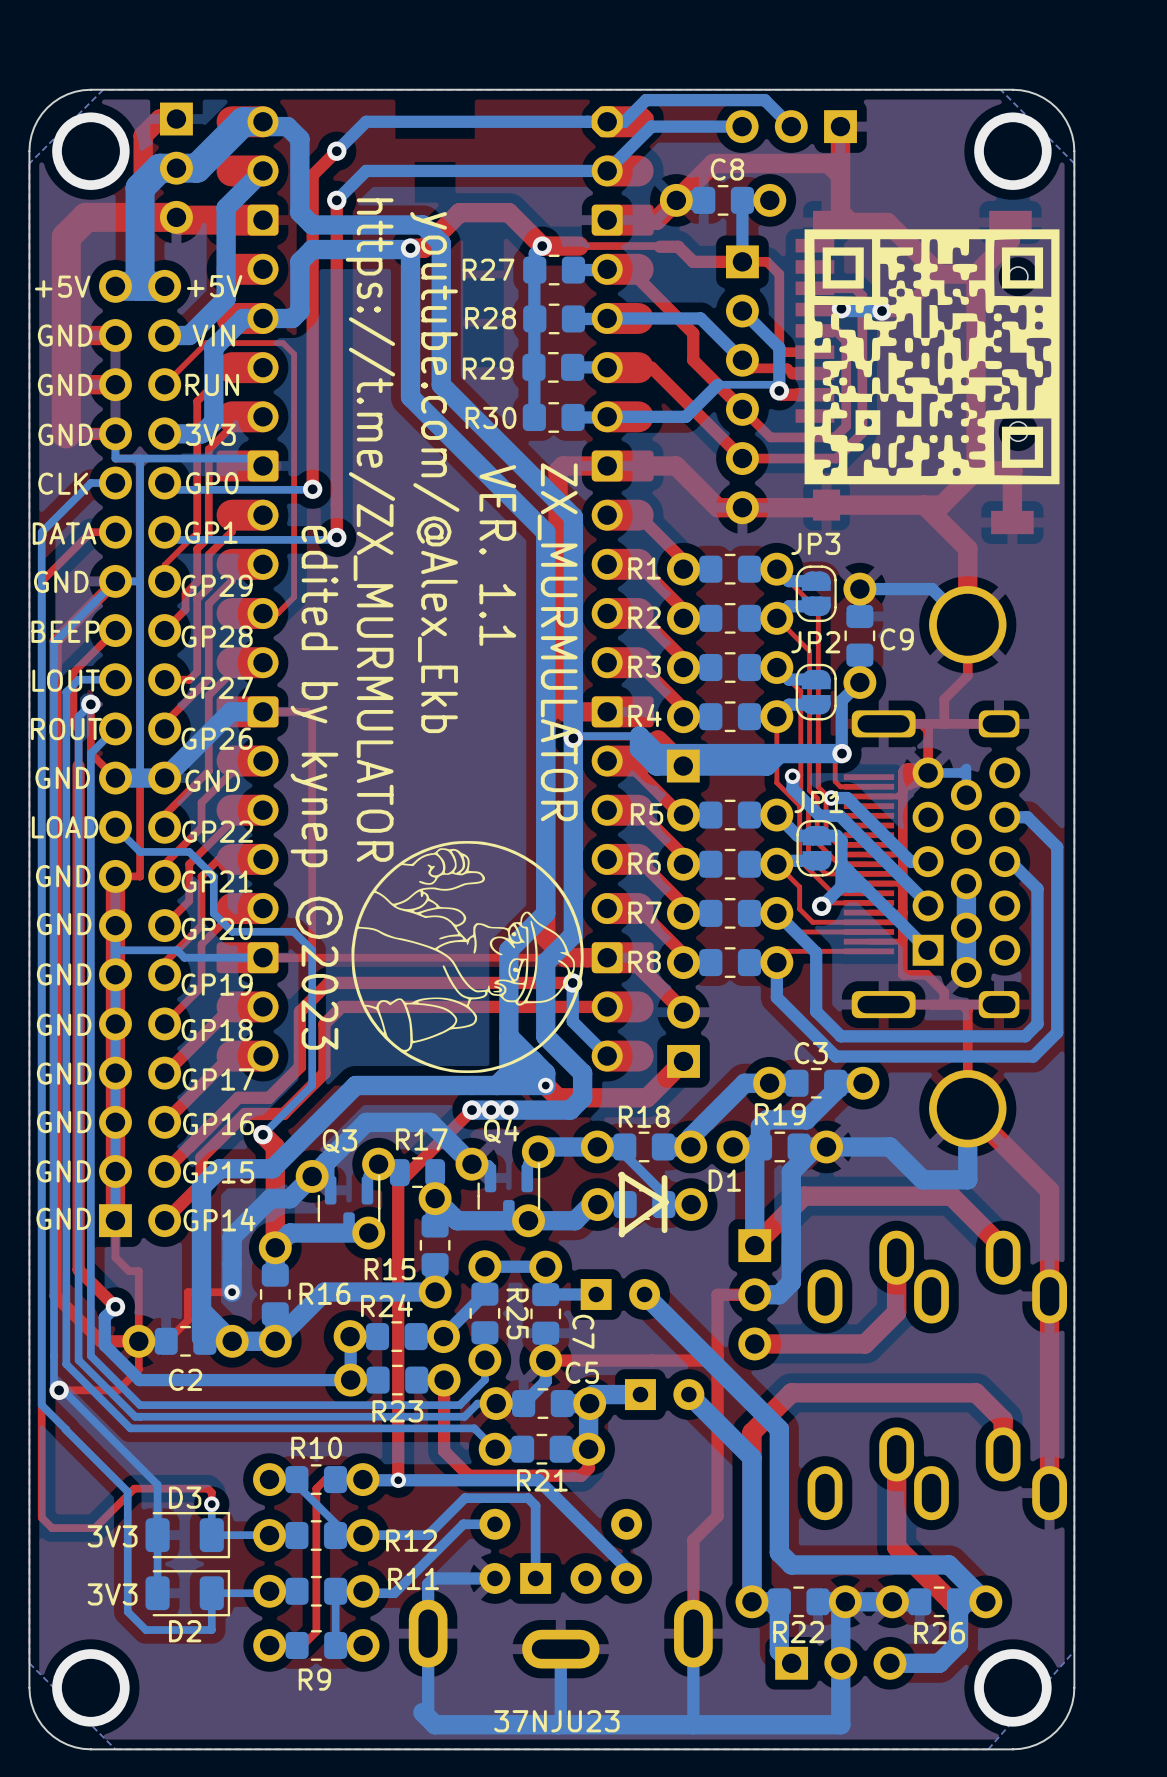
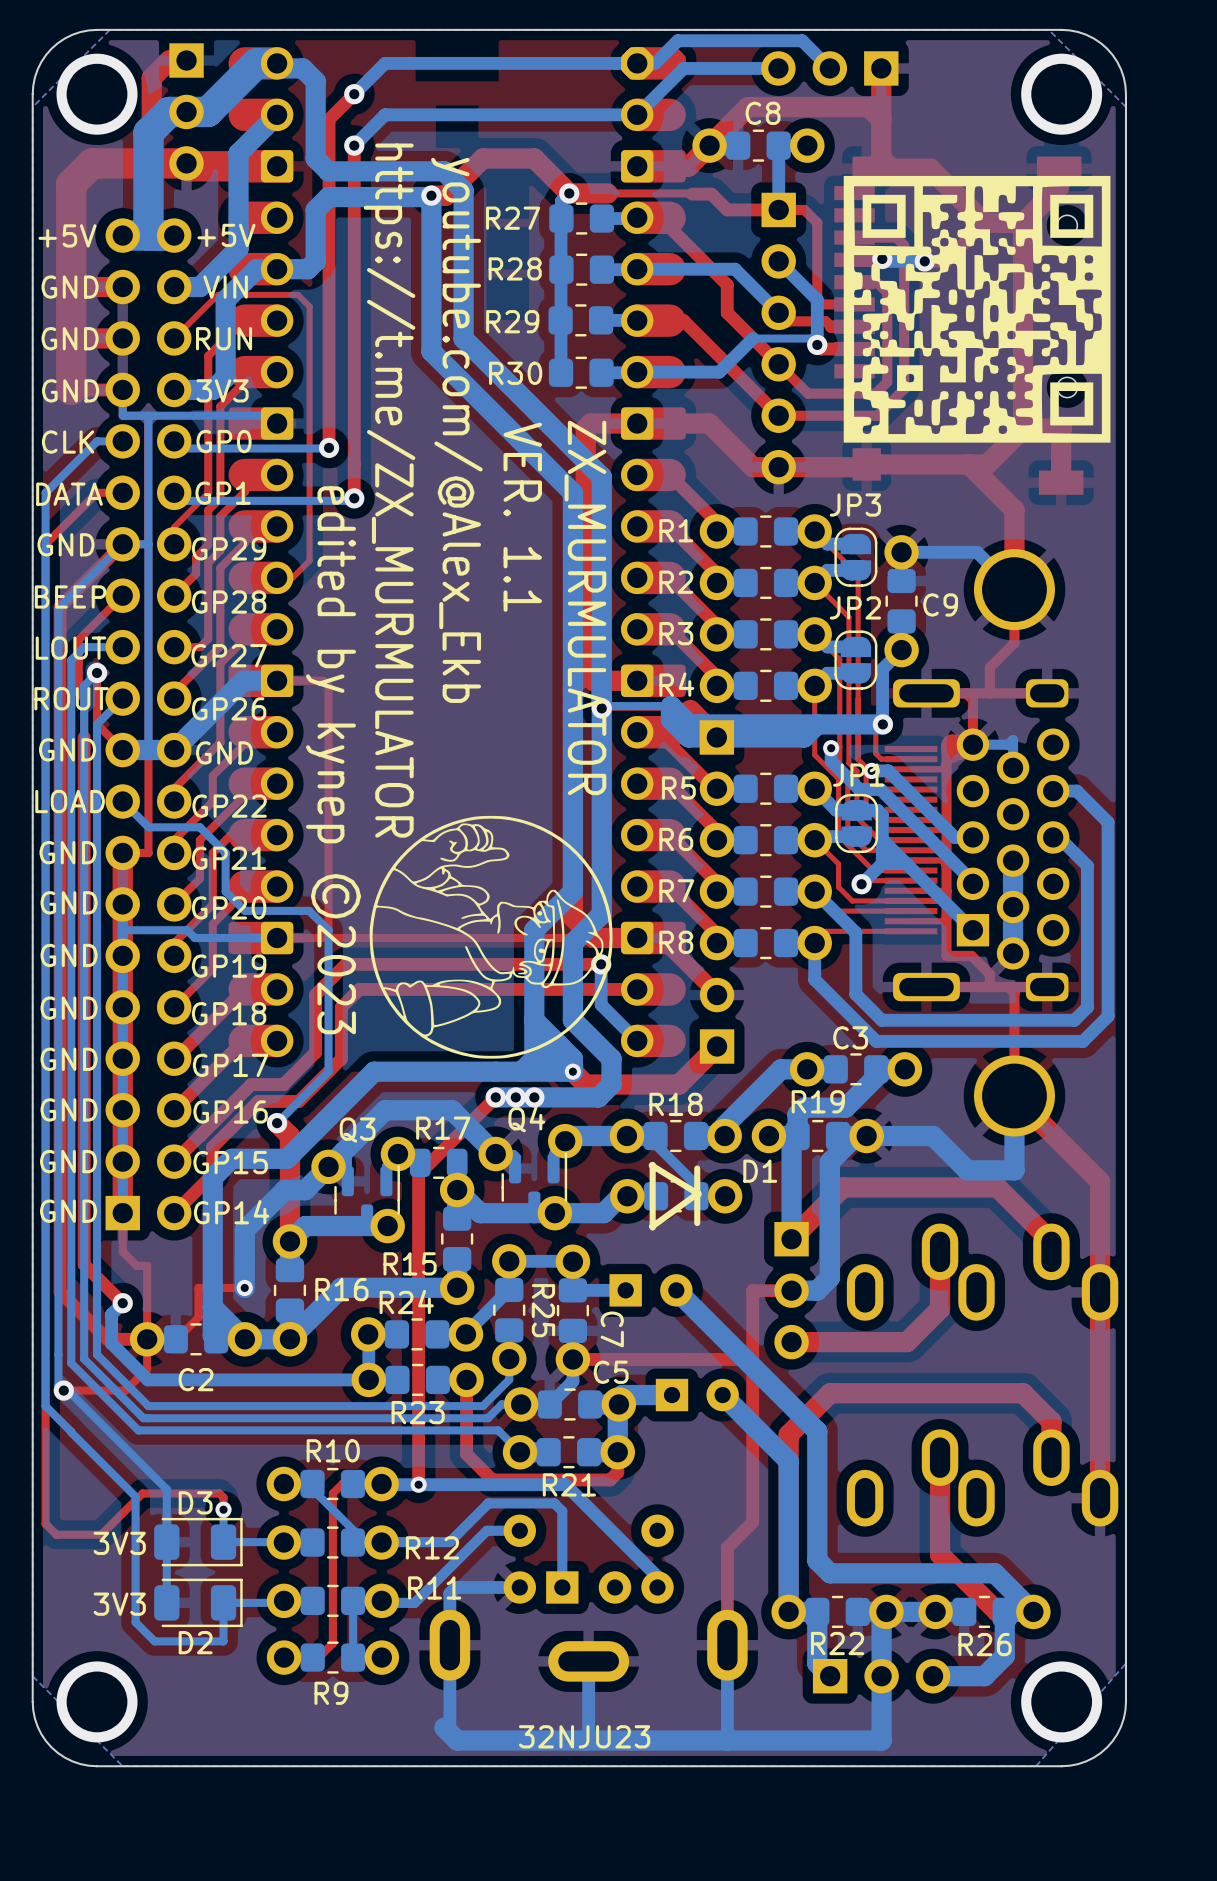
text: 37NJU23 (556, 1721) -> 32NJU23 (584, 1736)

